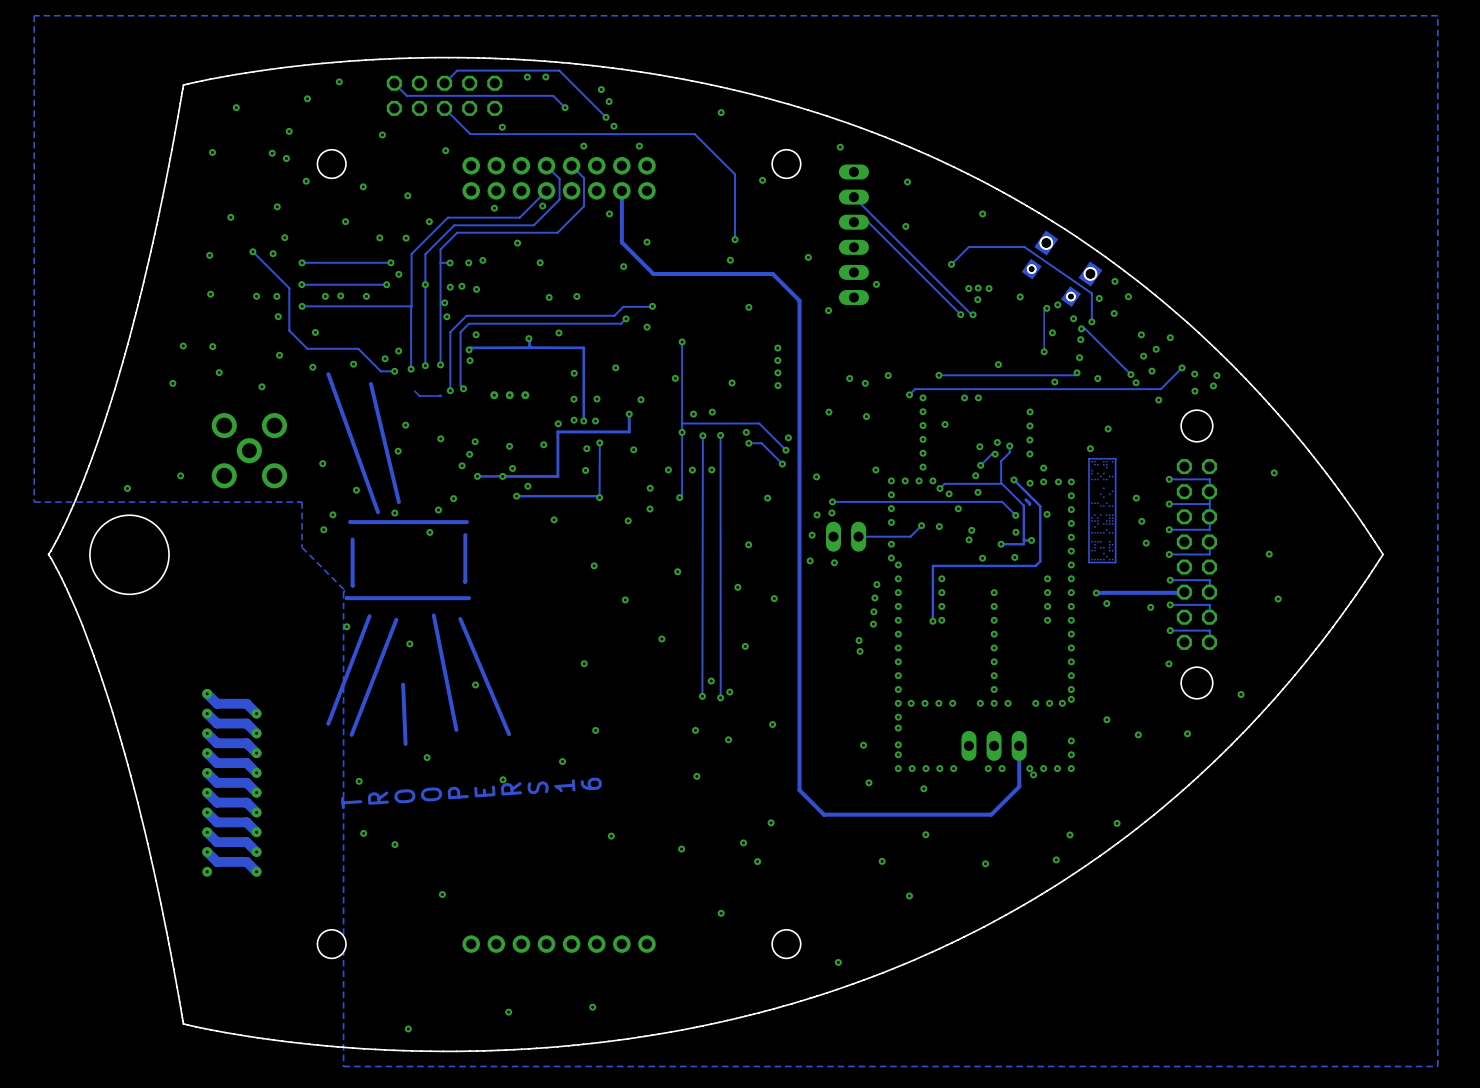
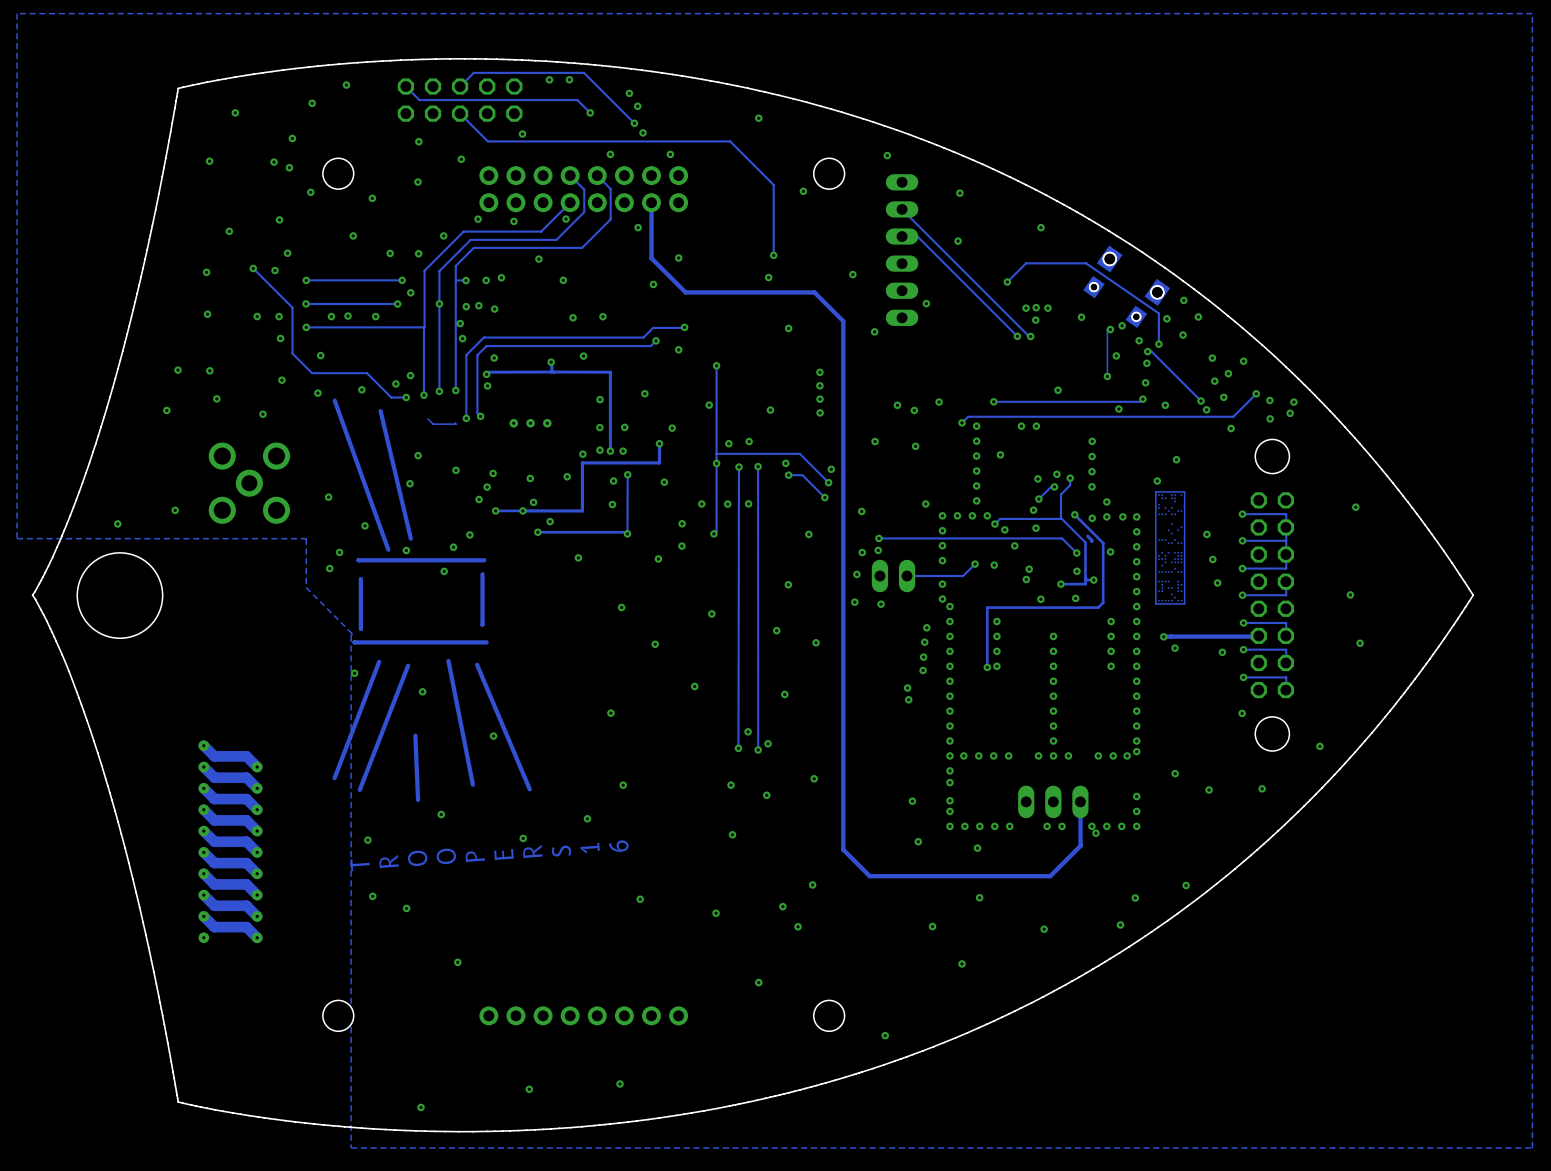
via: (382, 134) -> none
via: none -> (418, 141)
via: none -> (418, 182)
via: (407, 195) -> none
via: none -> (478, 219)

